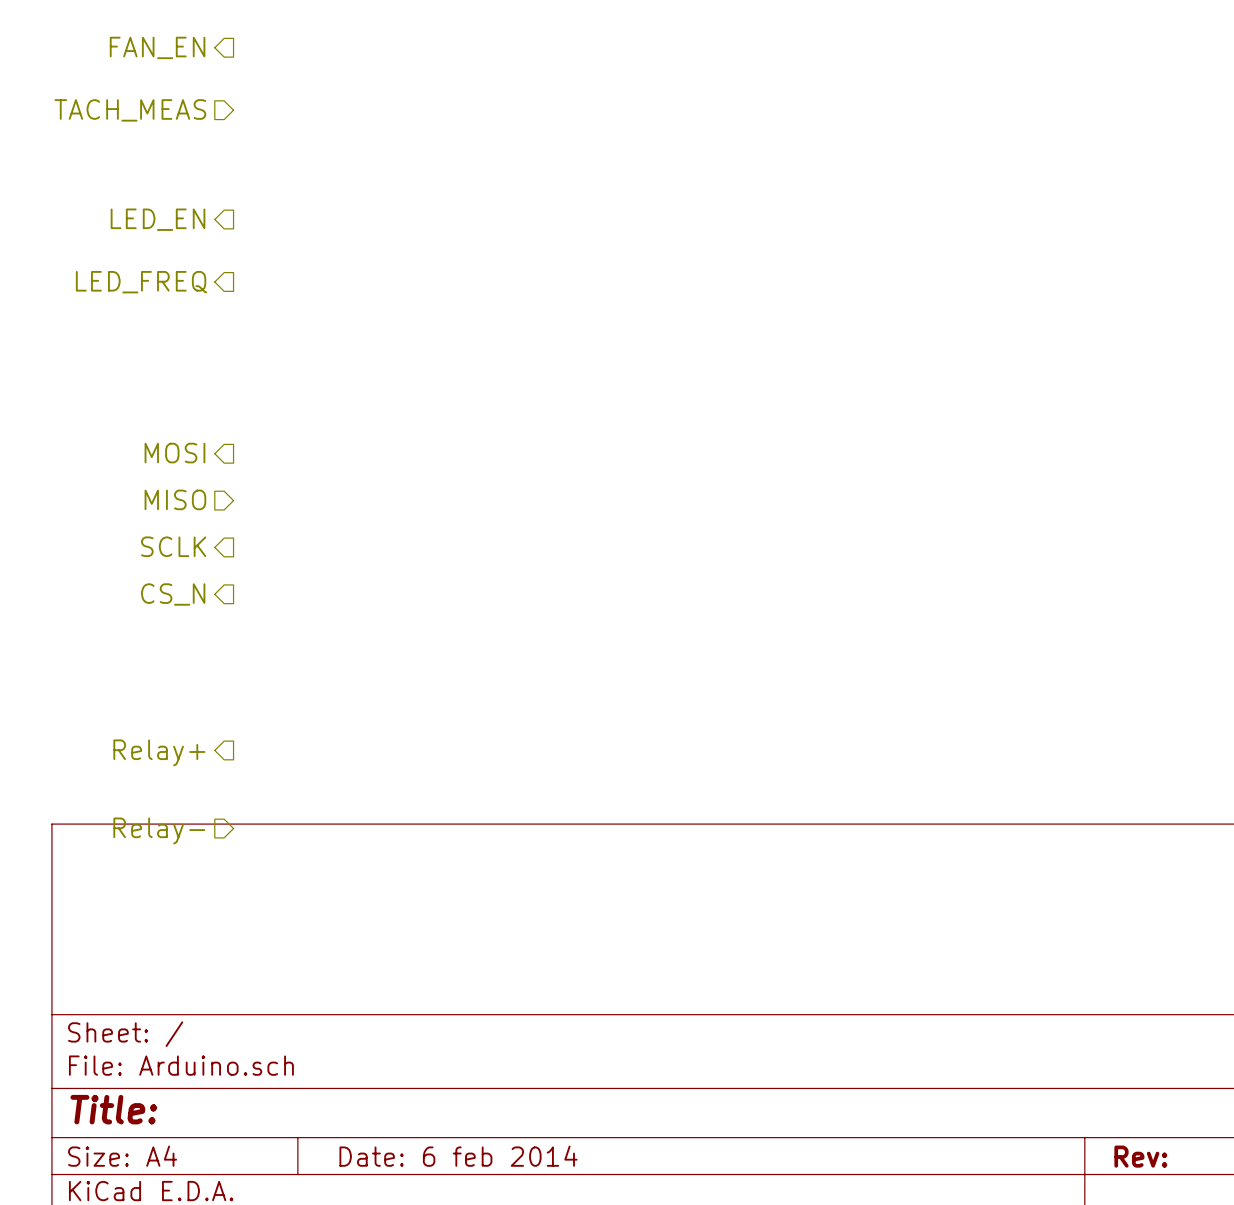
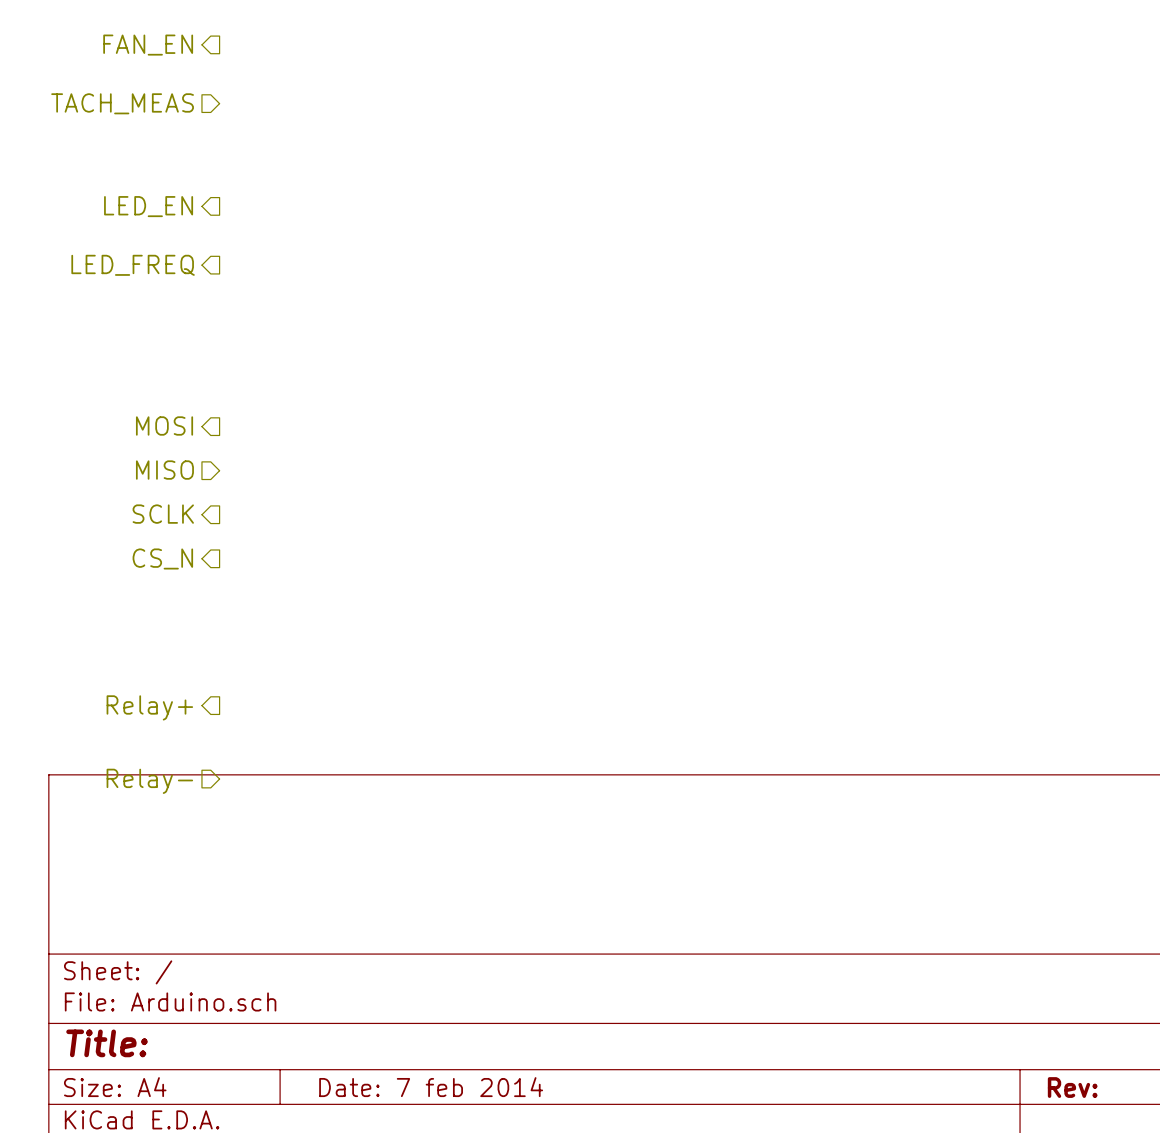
title block: Date: 6 feb 2014 (458, 1156) -> Date: 7 feb 2014 (431, 1087)

